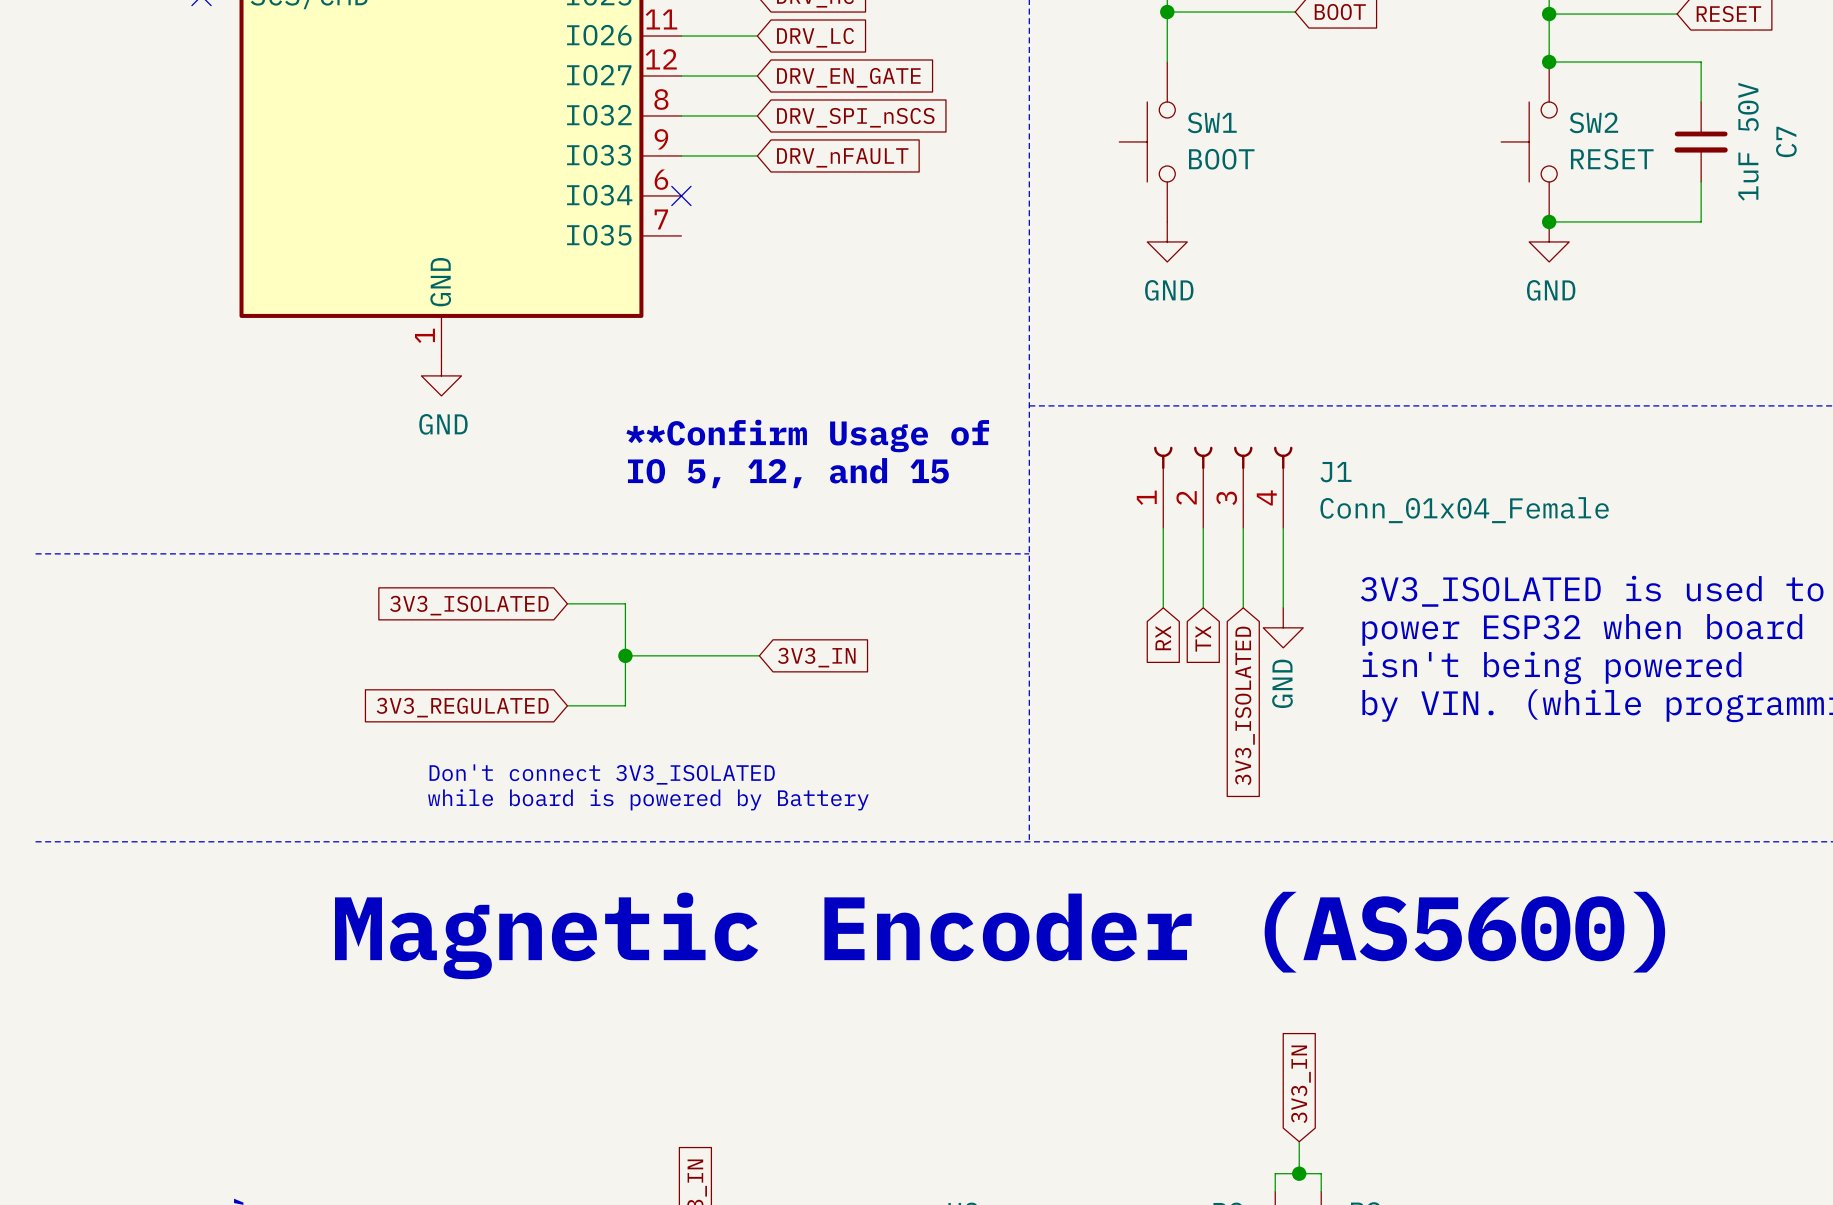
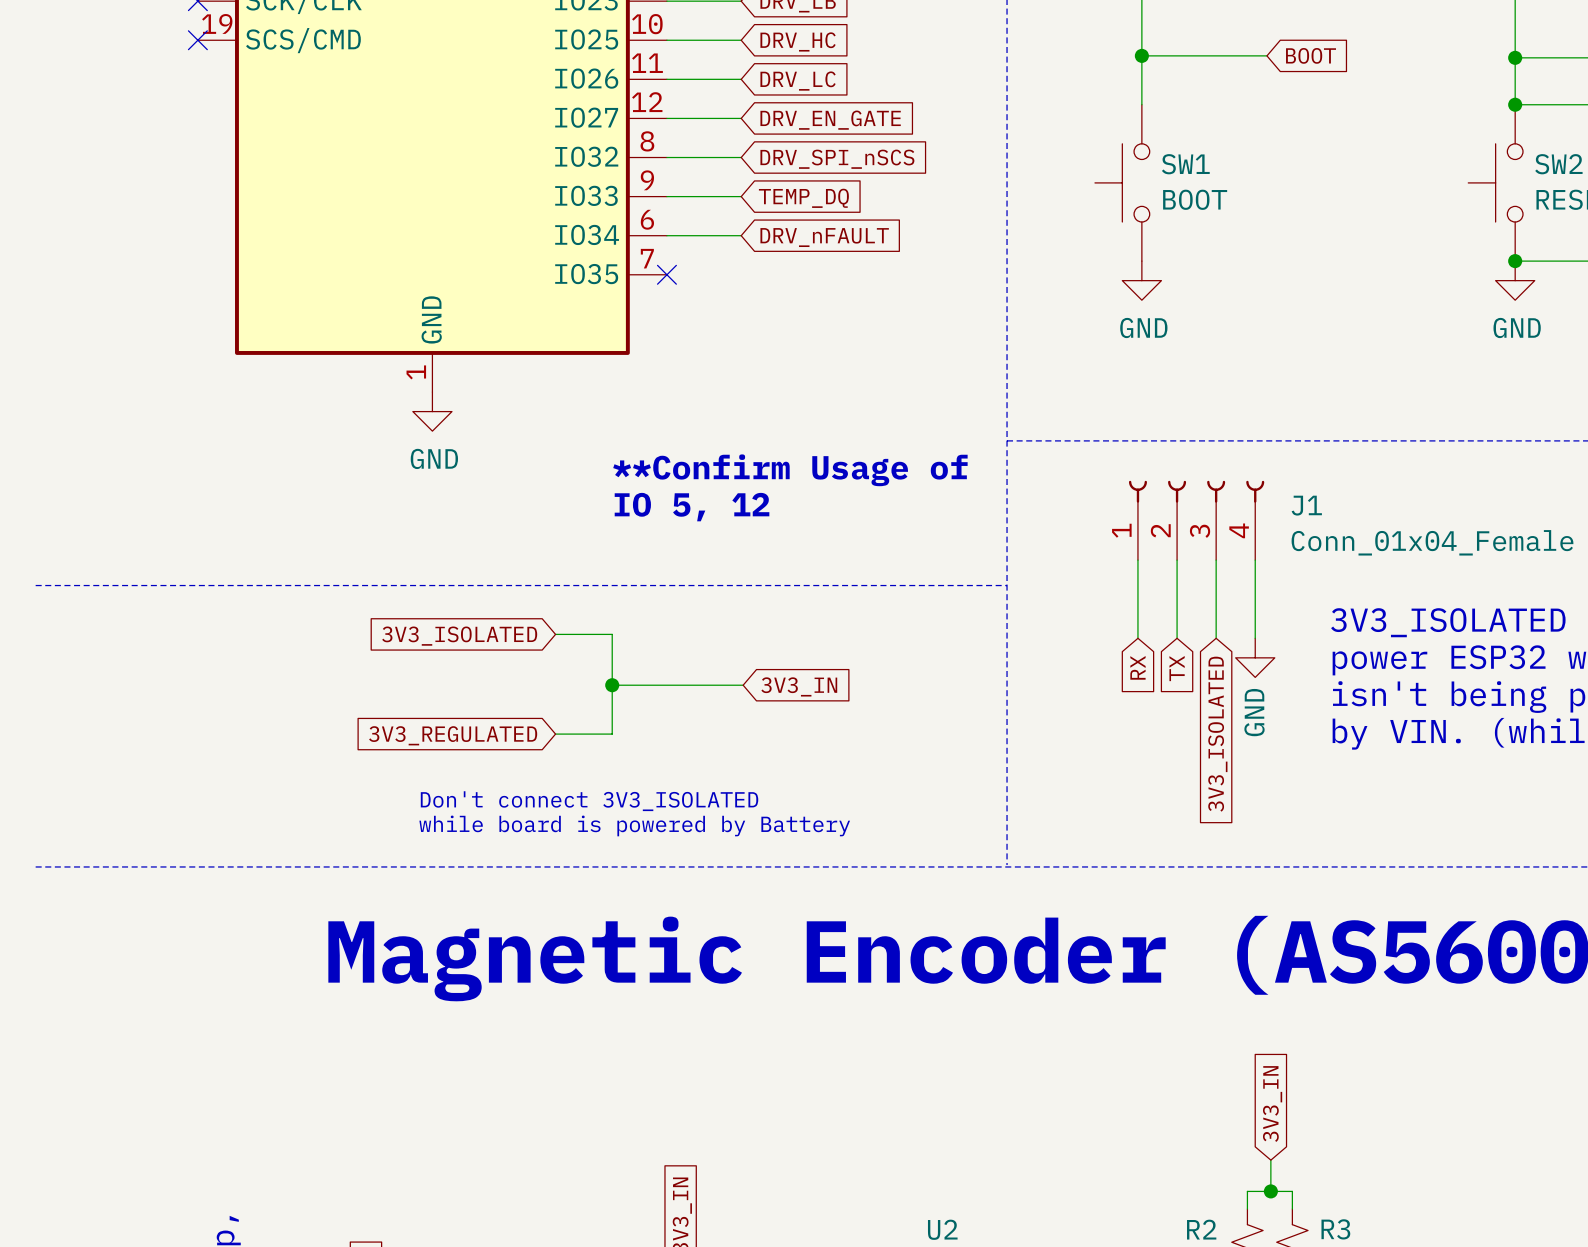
global label: DRV_nFAULT (842, 157) -> TEMP_DQ (803, 198)
wire: none -> (666, 235) (741, 235)
no-connect mark position: (681, 195) -> (666, 274)
global label: none -> DRV_nFAULT (824, 237)
text: IO 5, 12, and 15 (788, 473) -> IO 5, 12 (692, 507)

